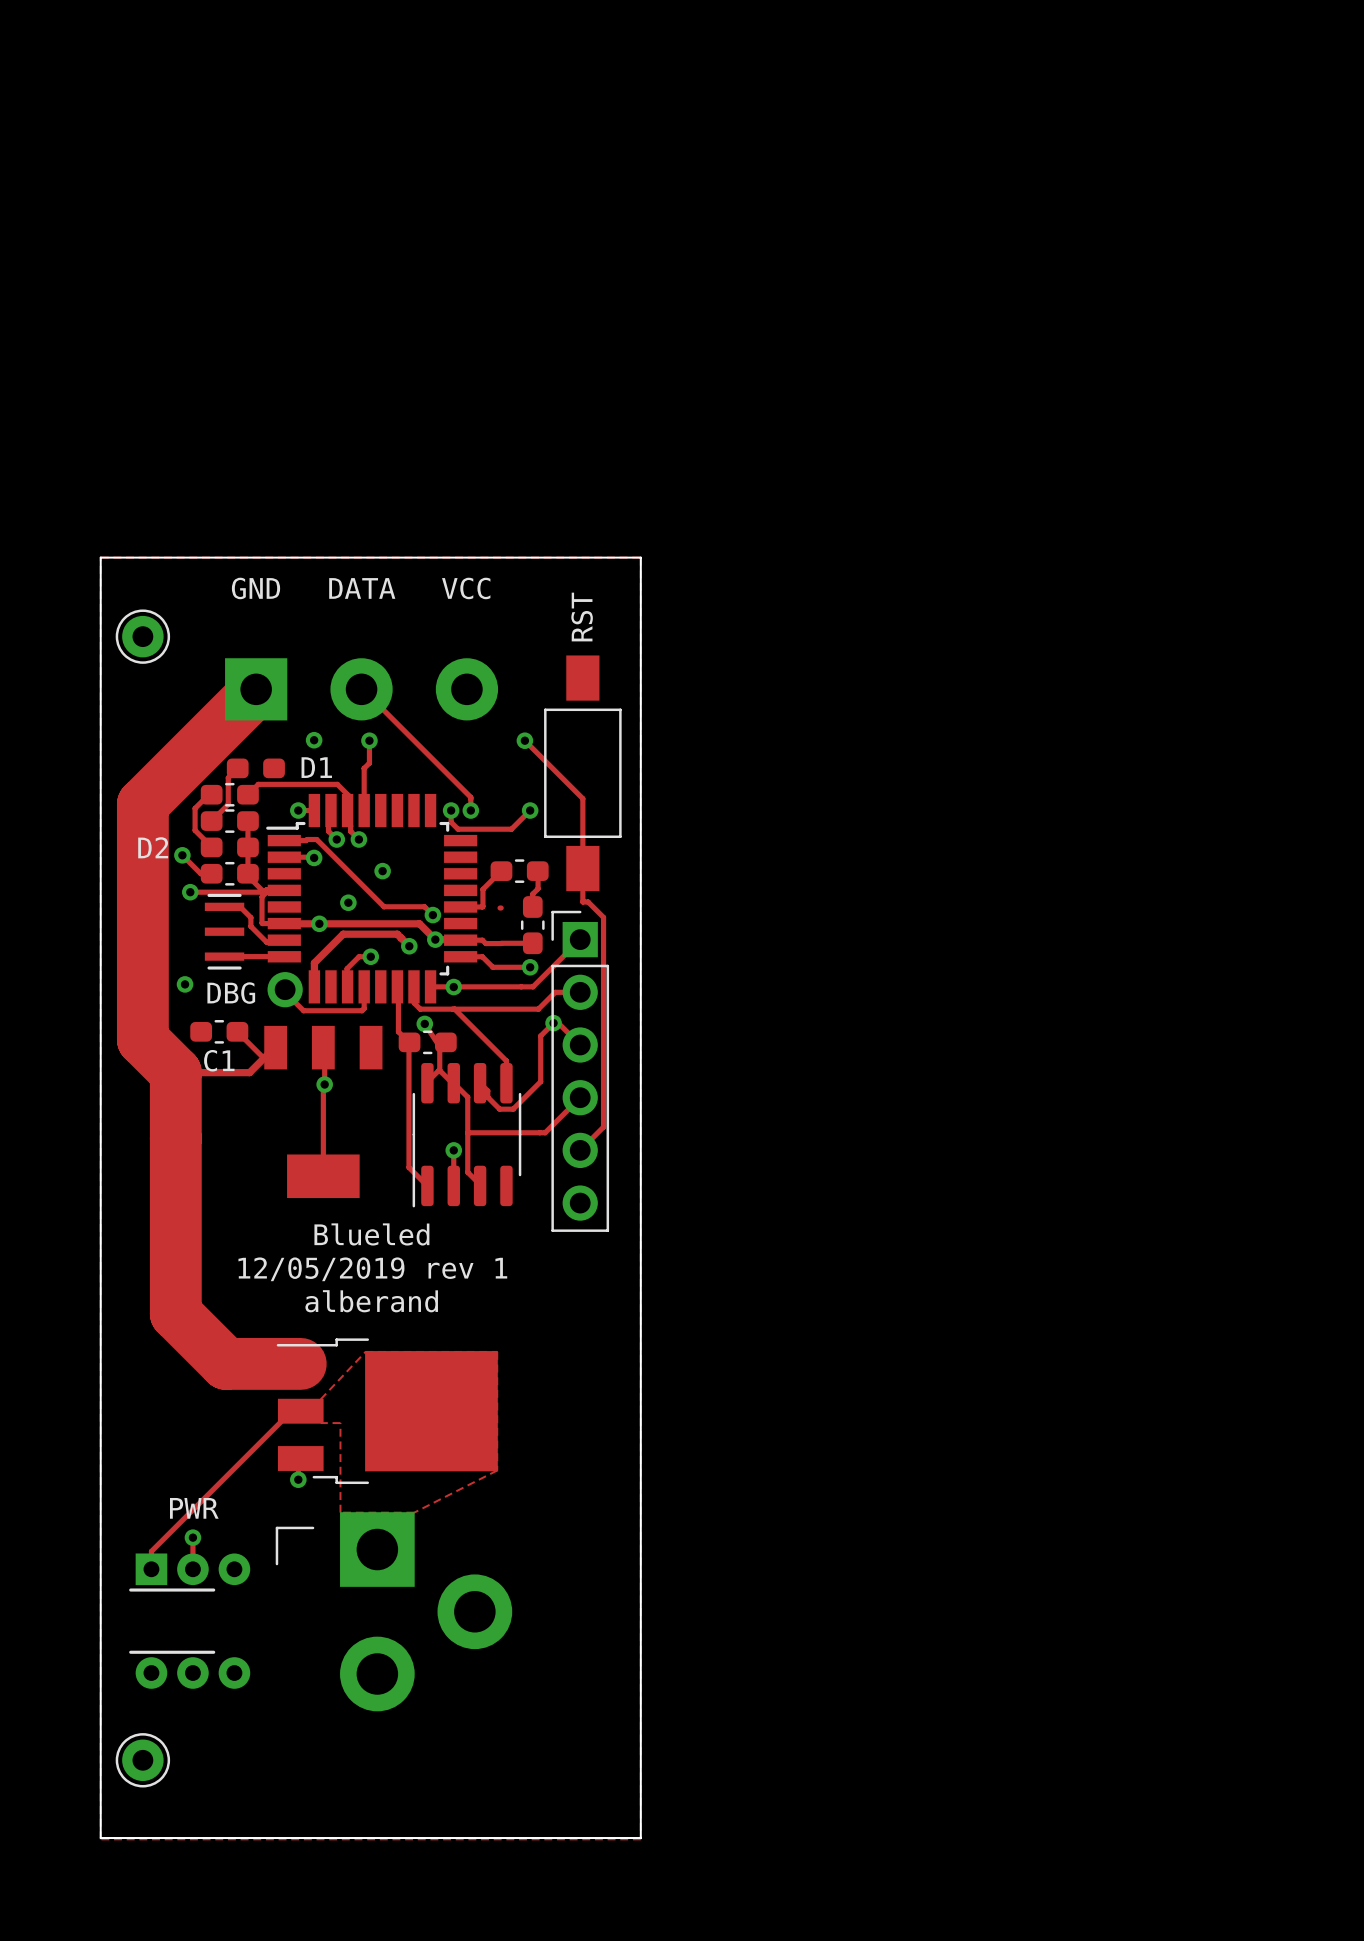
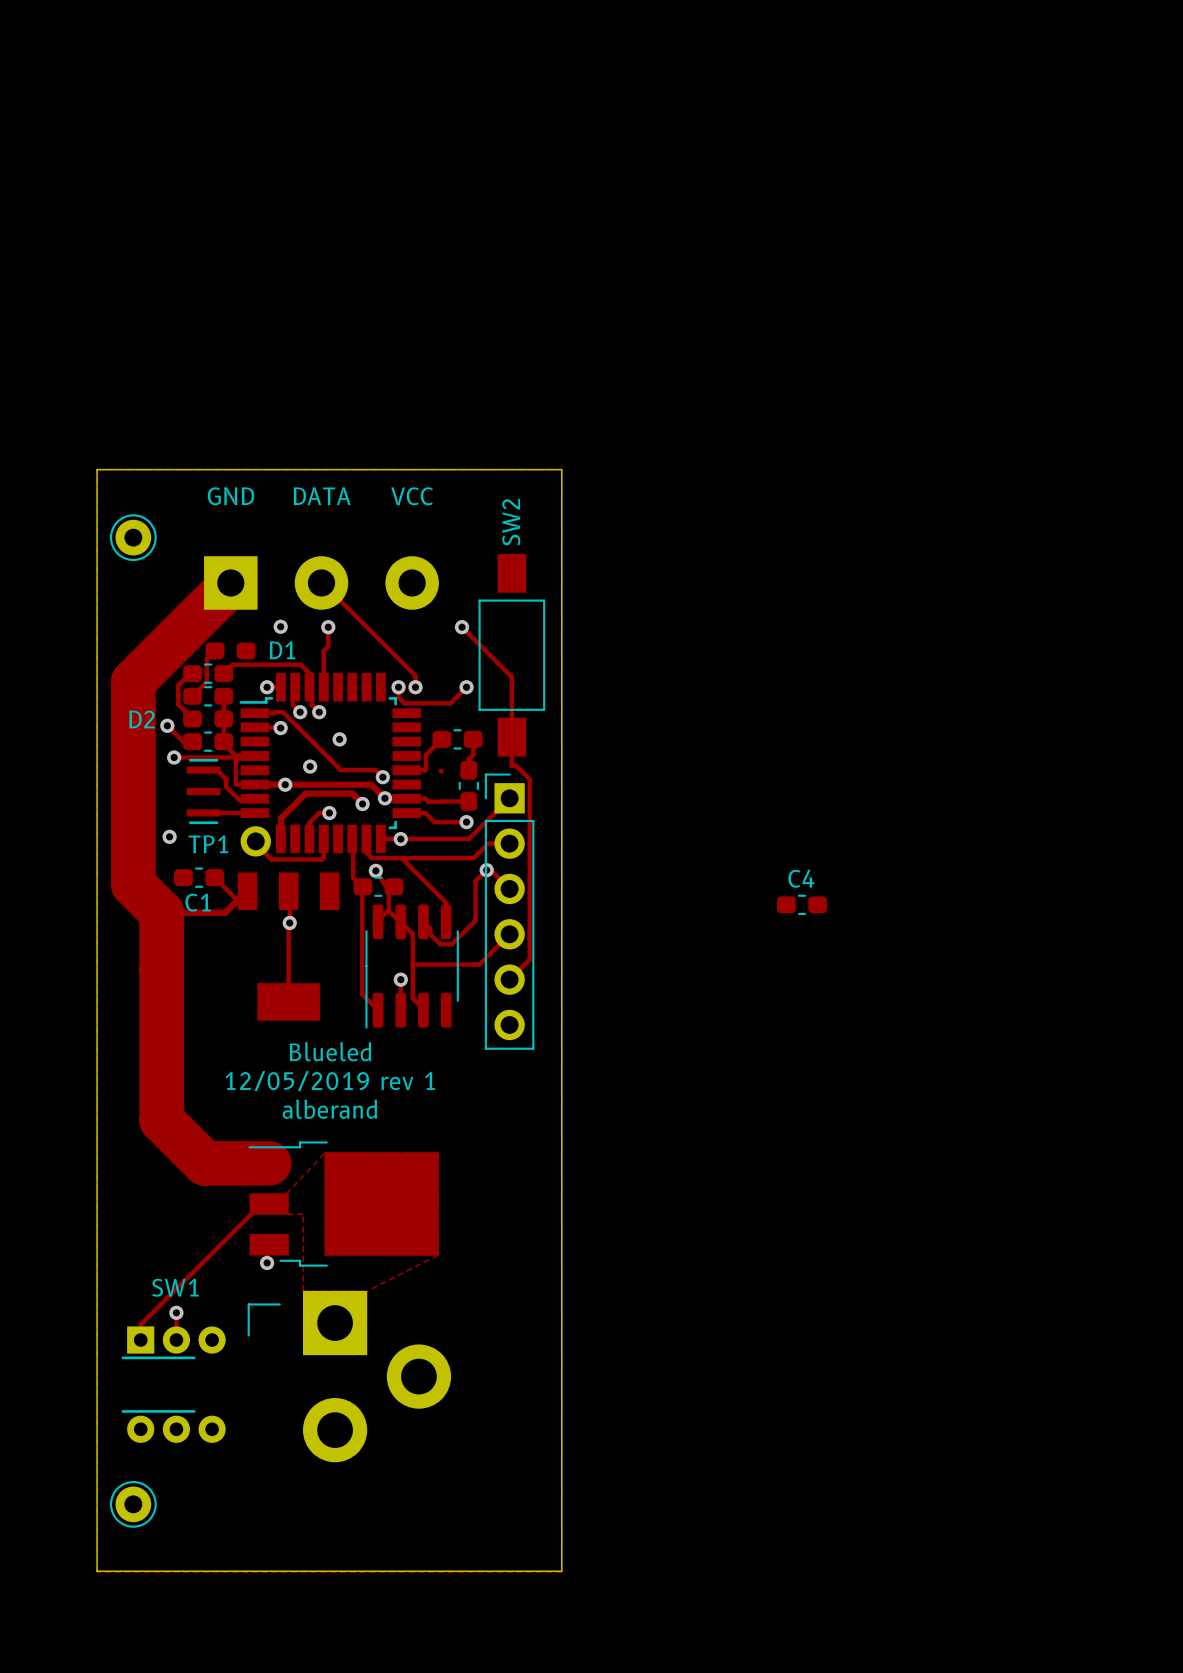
RST name: RST (582, 617) -> SW2 (511, 522)
DBG name: DBG (231, 993) -> TP1 (208, 844)
C4: none -> (802, 904)
PWR name: PWR (194, 1508) -> SW1 (175, 1287)

